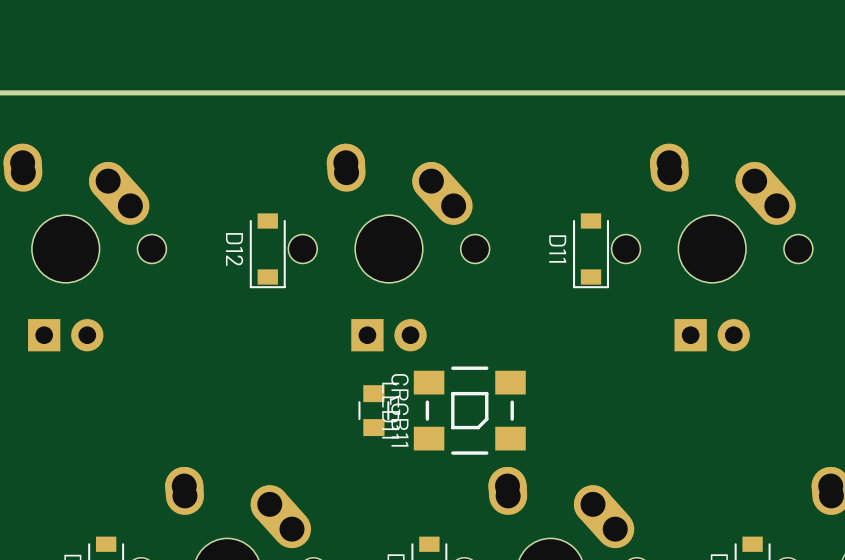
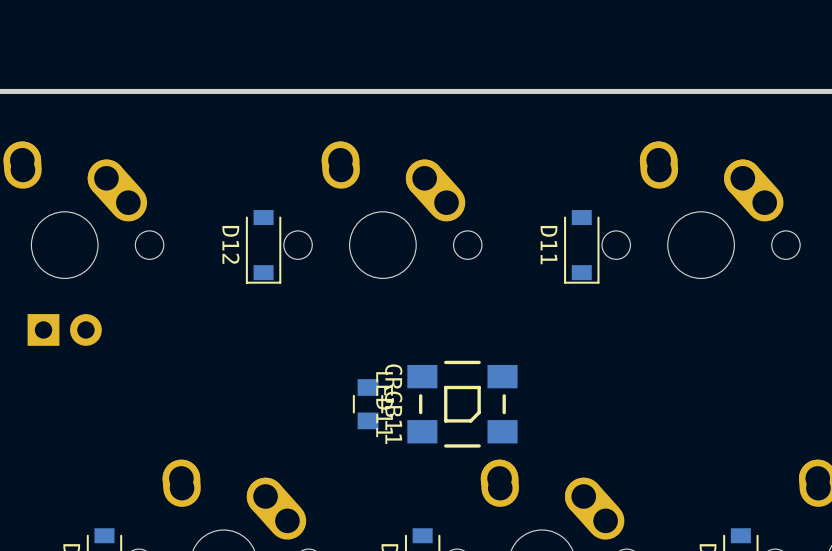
part: (388, 247) -> none
part: (712, 247) -> none

